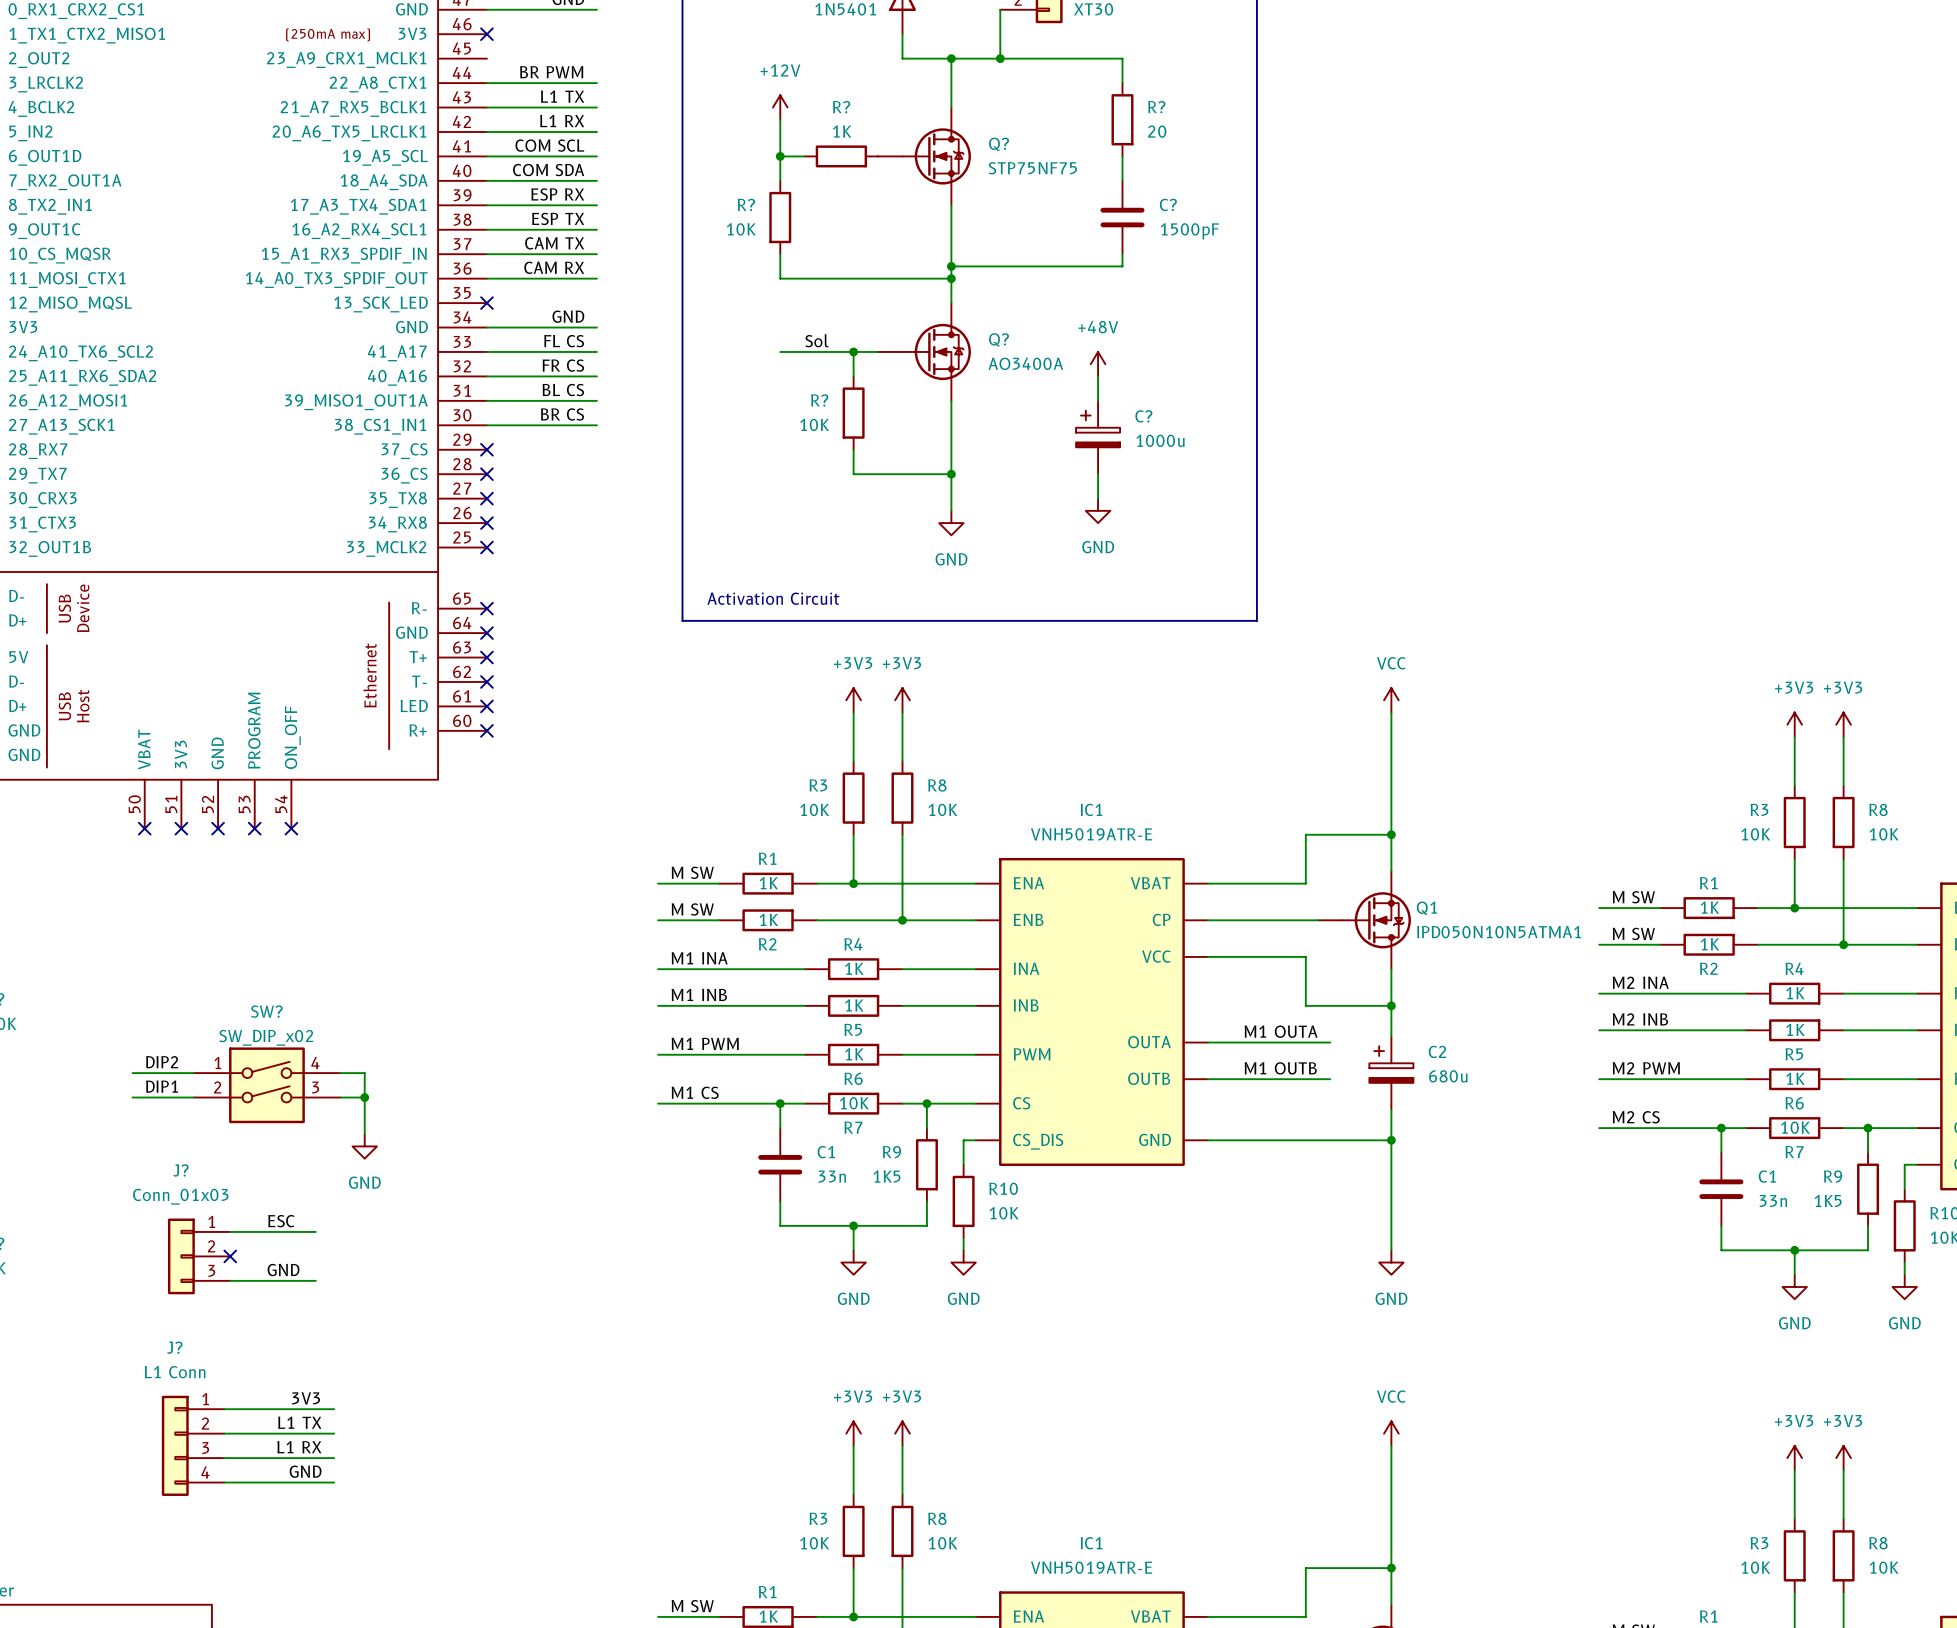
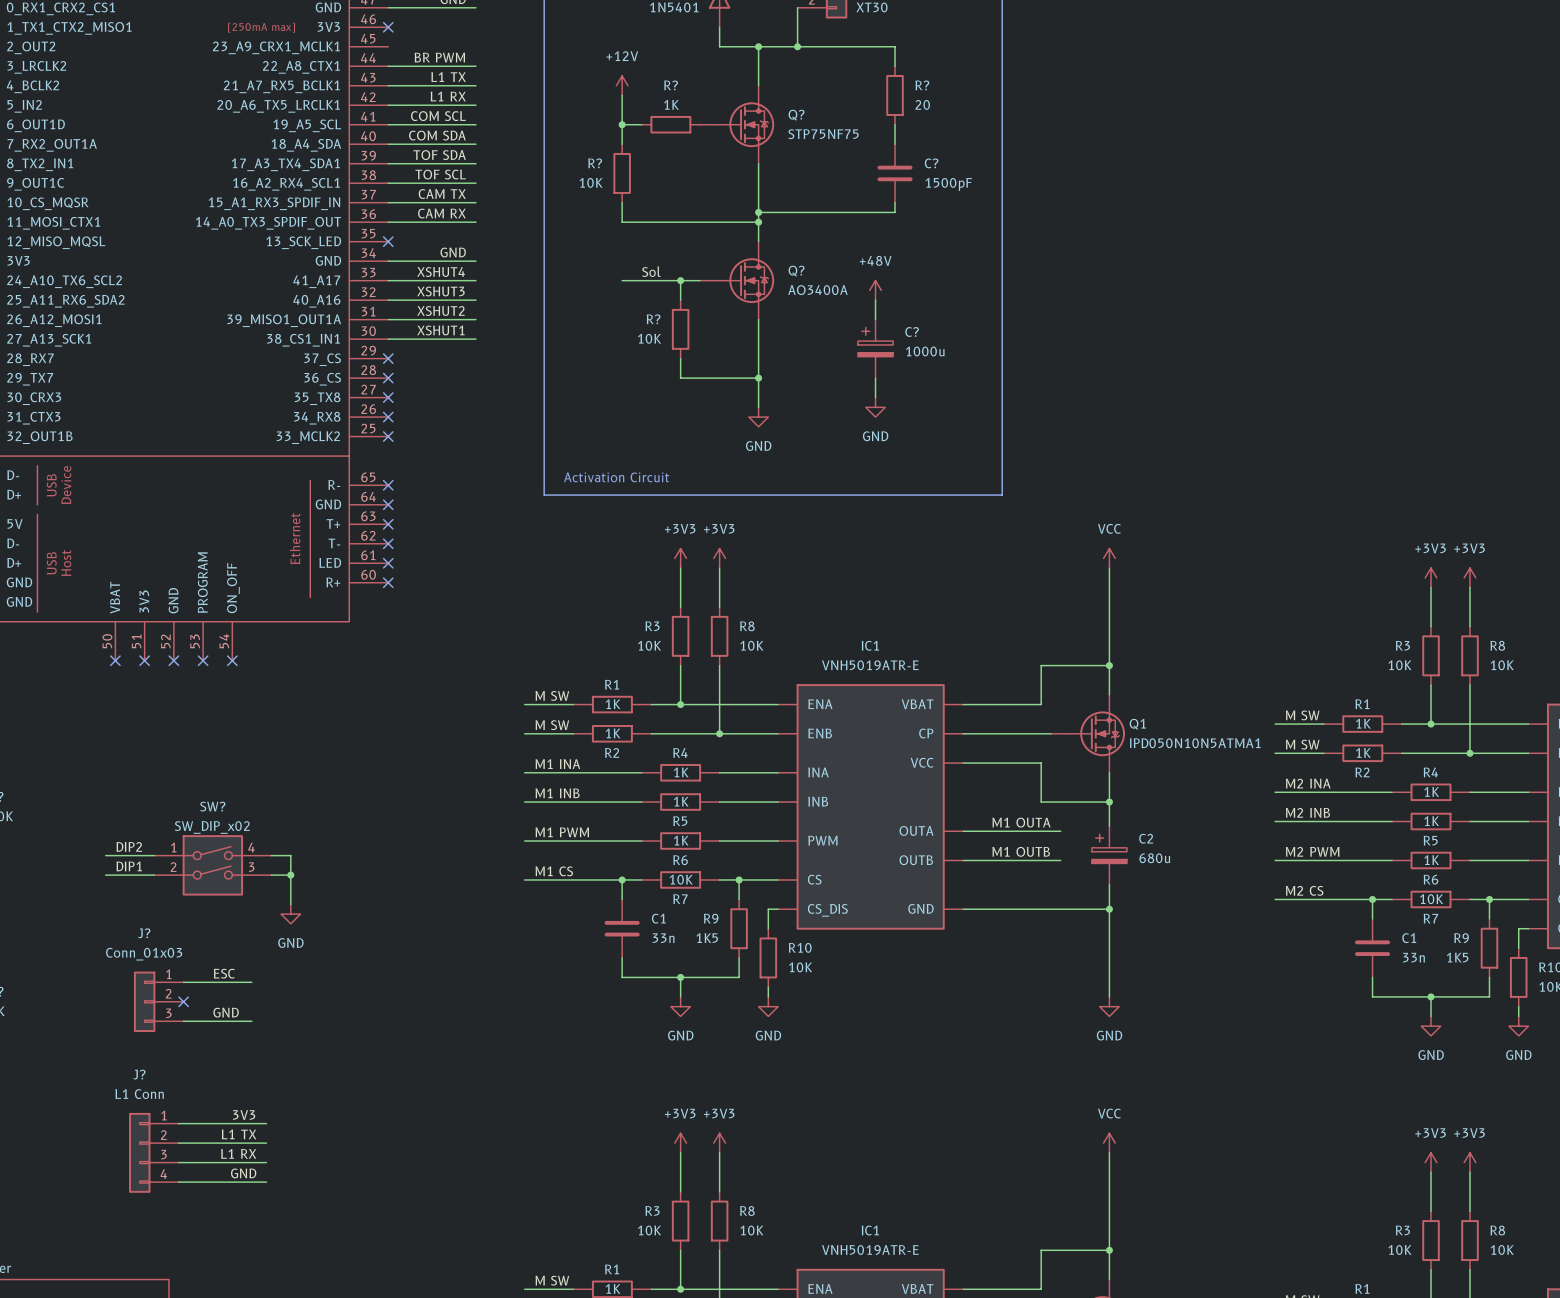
label: ESP RX (557, 194) -> TOF SDA (439, 155)
label: ESP TX (558, 218) -> TOF SCL (440, 174)
label: FL CS (564, 341) -> XSHUT4 (441, 272)
label: FR CS (563, 365) -> XSHUT3 (440, 291)
label: BL CS (563, 390) -> XSHUT2 (440, 310)
label: BR CS (562, 414) -> XSHUT1 (440, 330)

